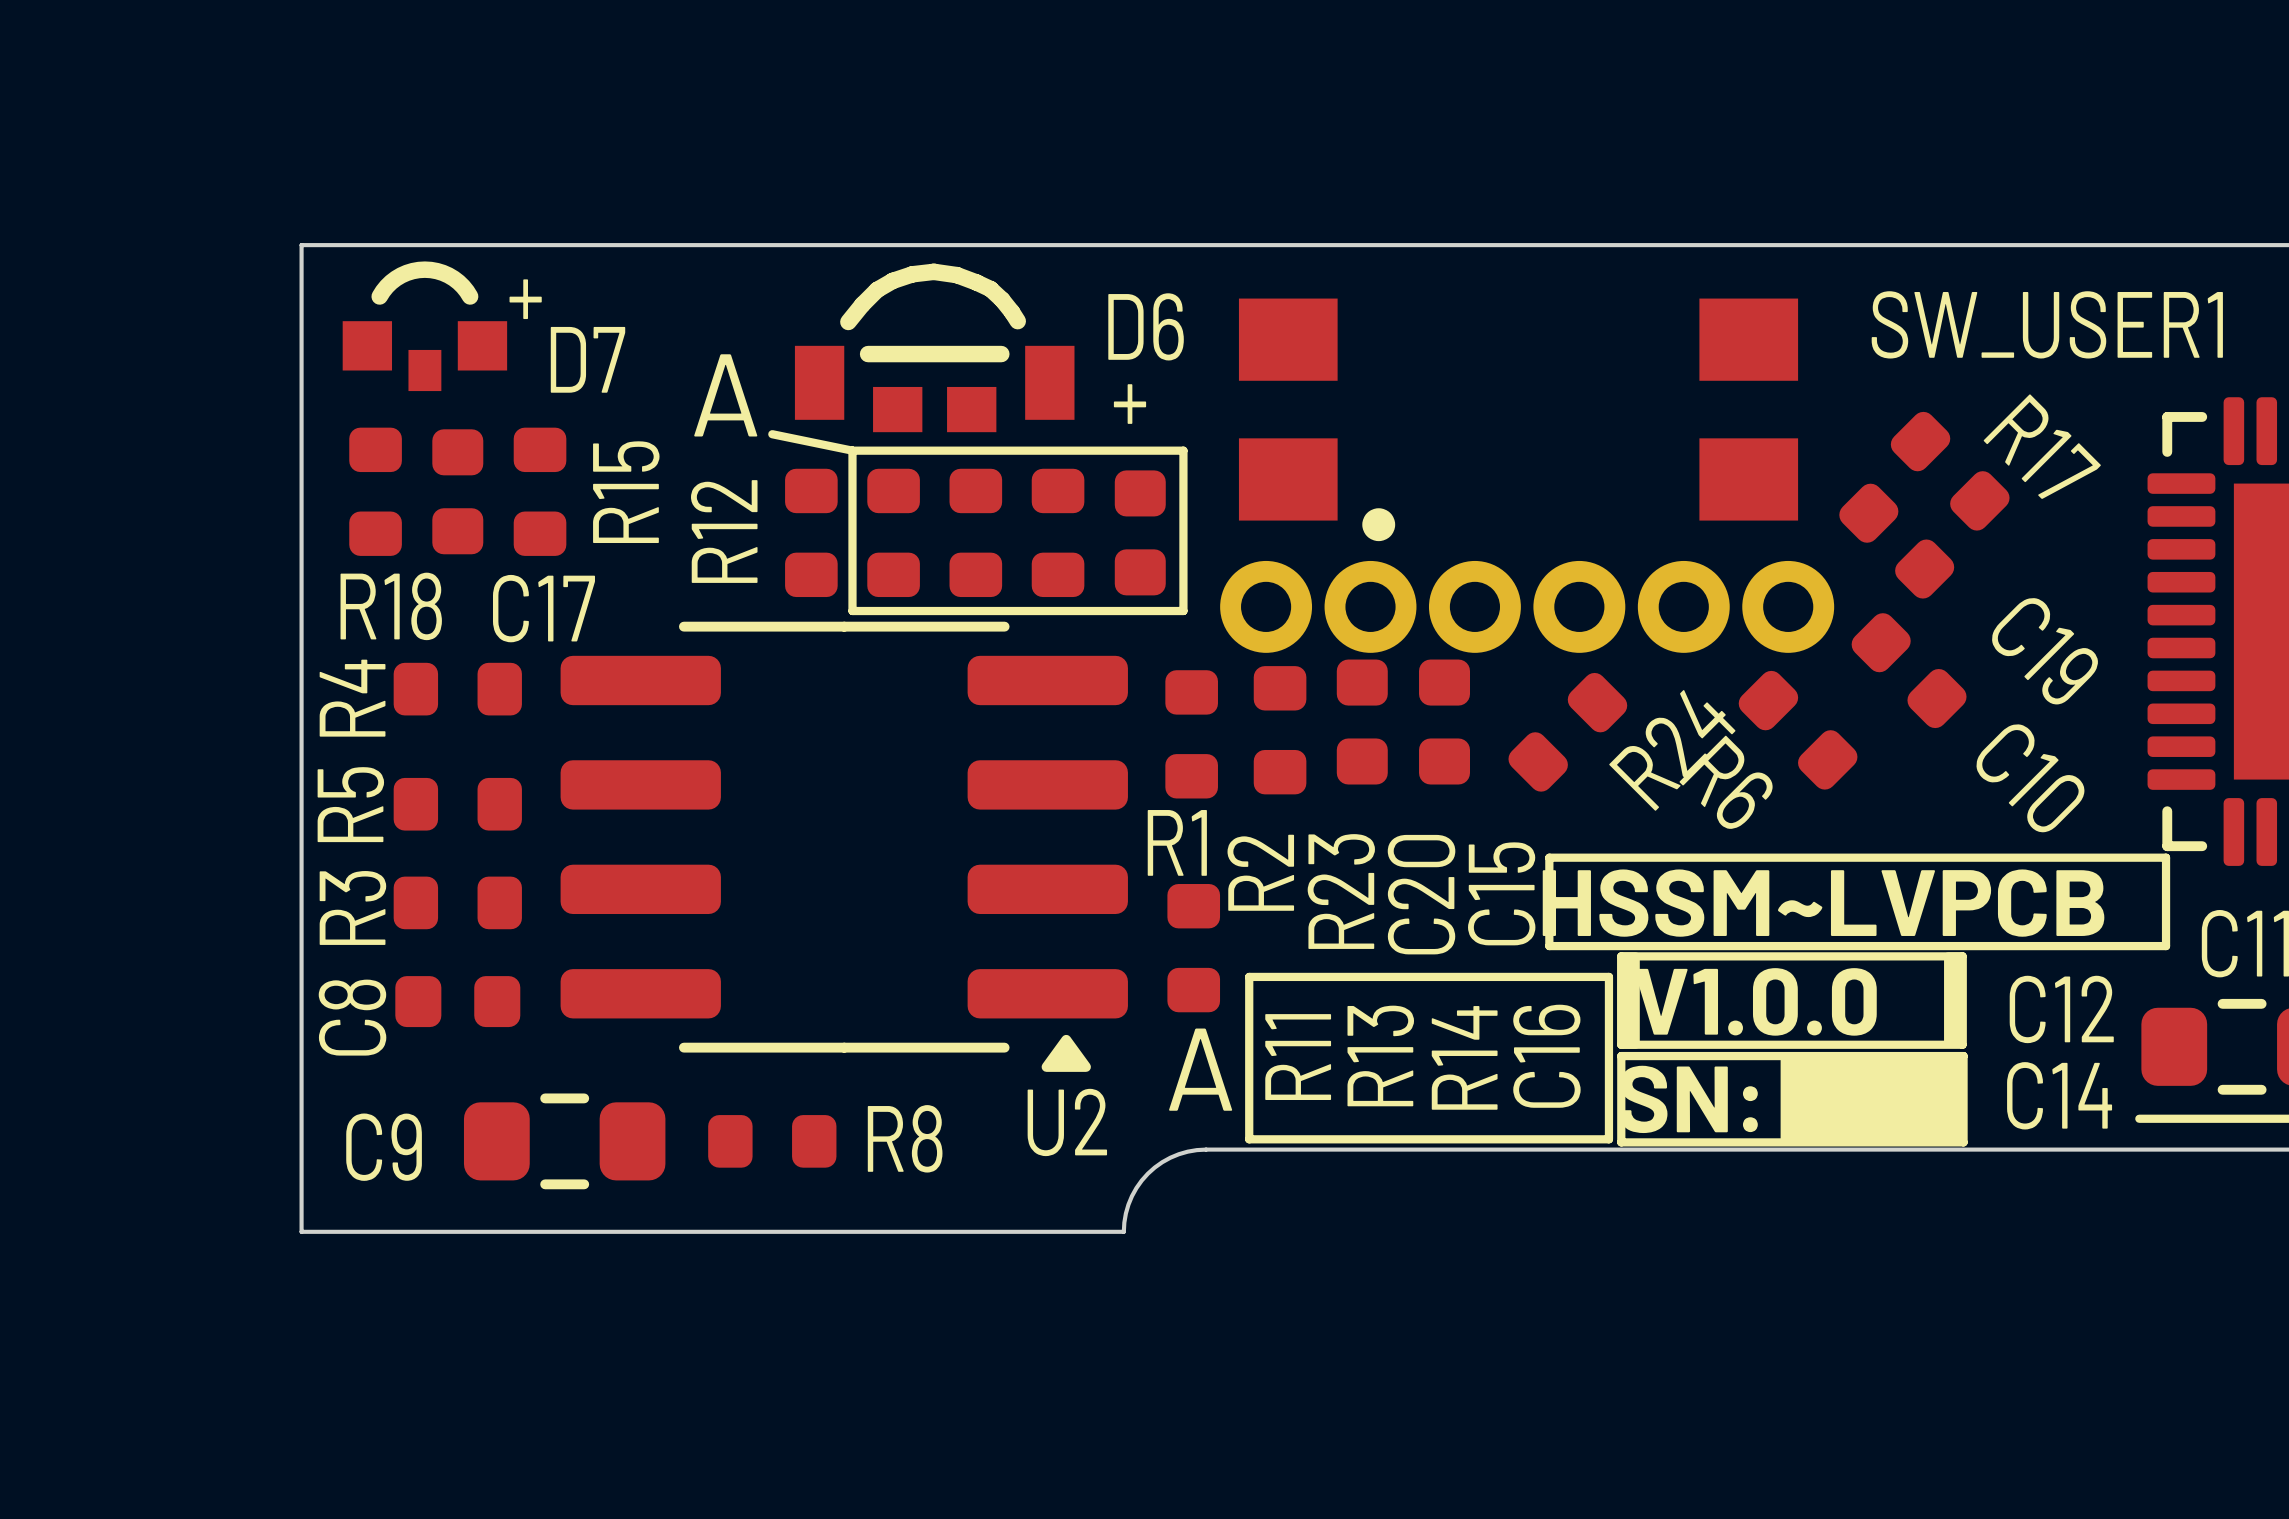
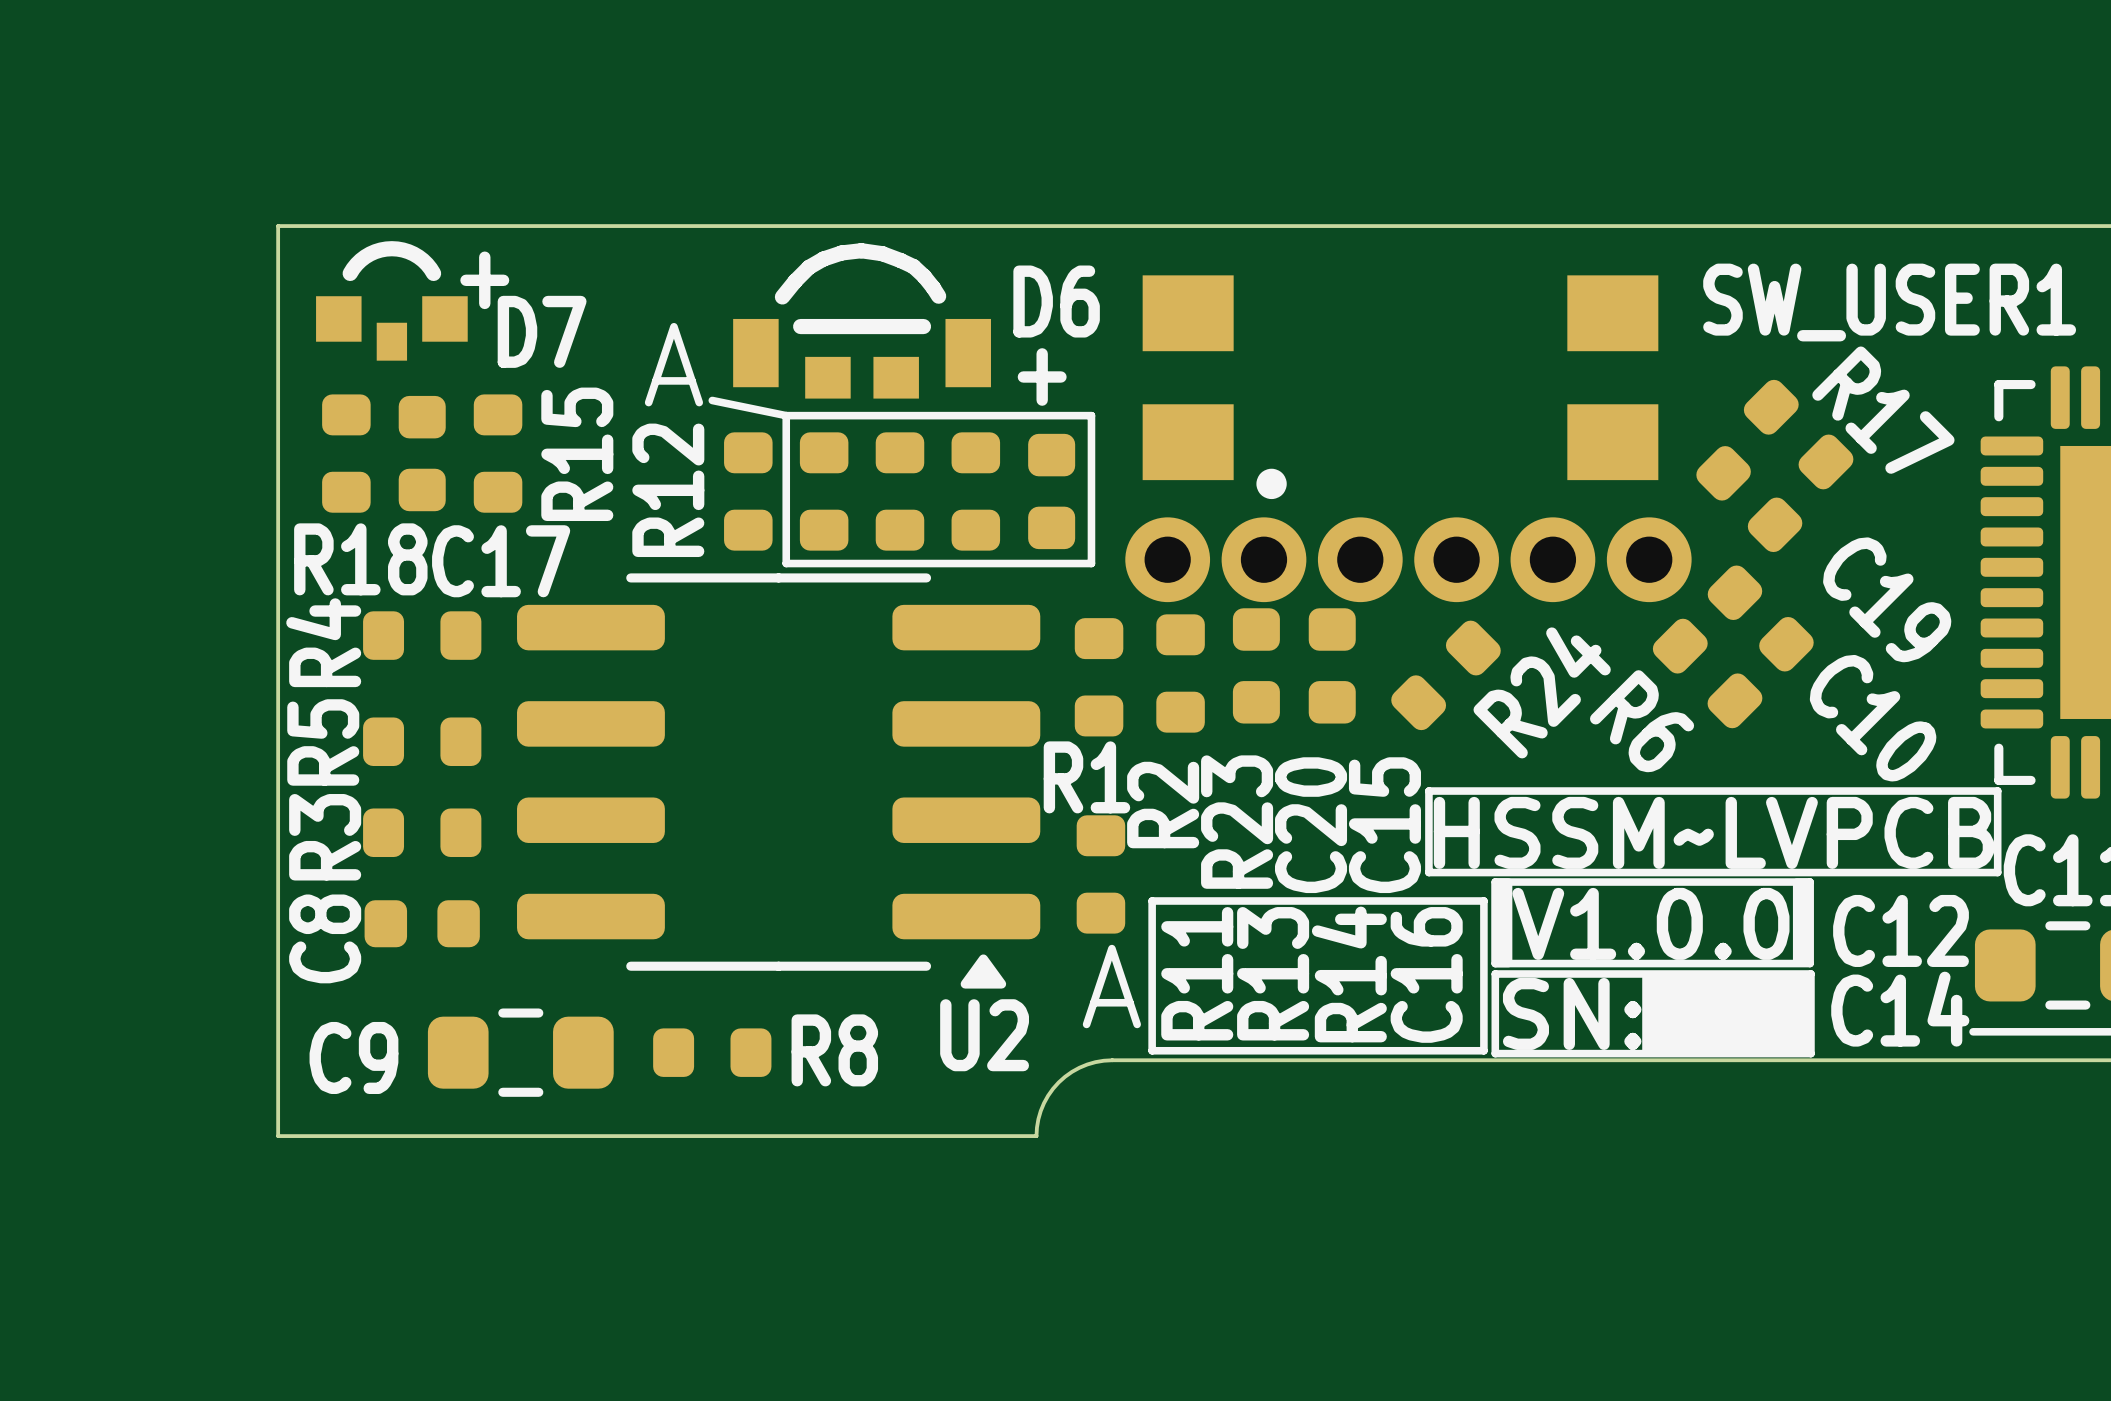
R6 position: (1798, 730) -> (1707, 673)

